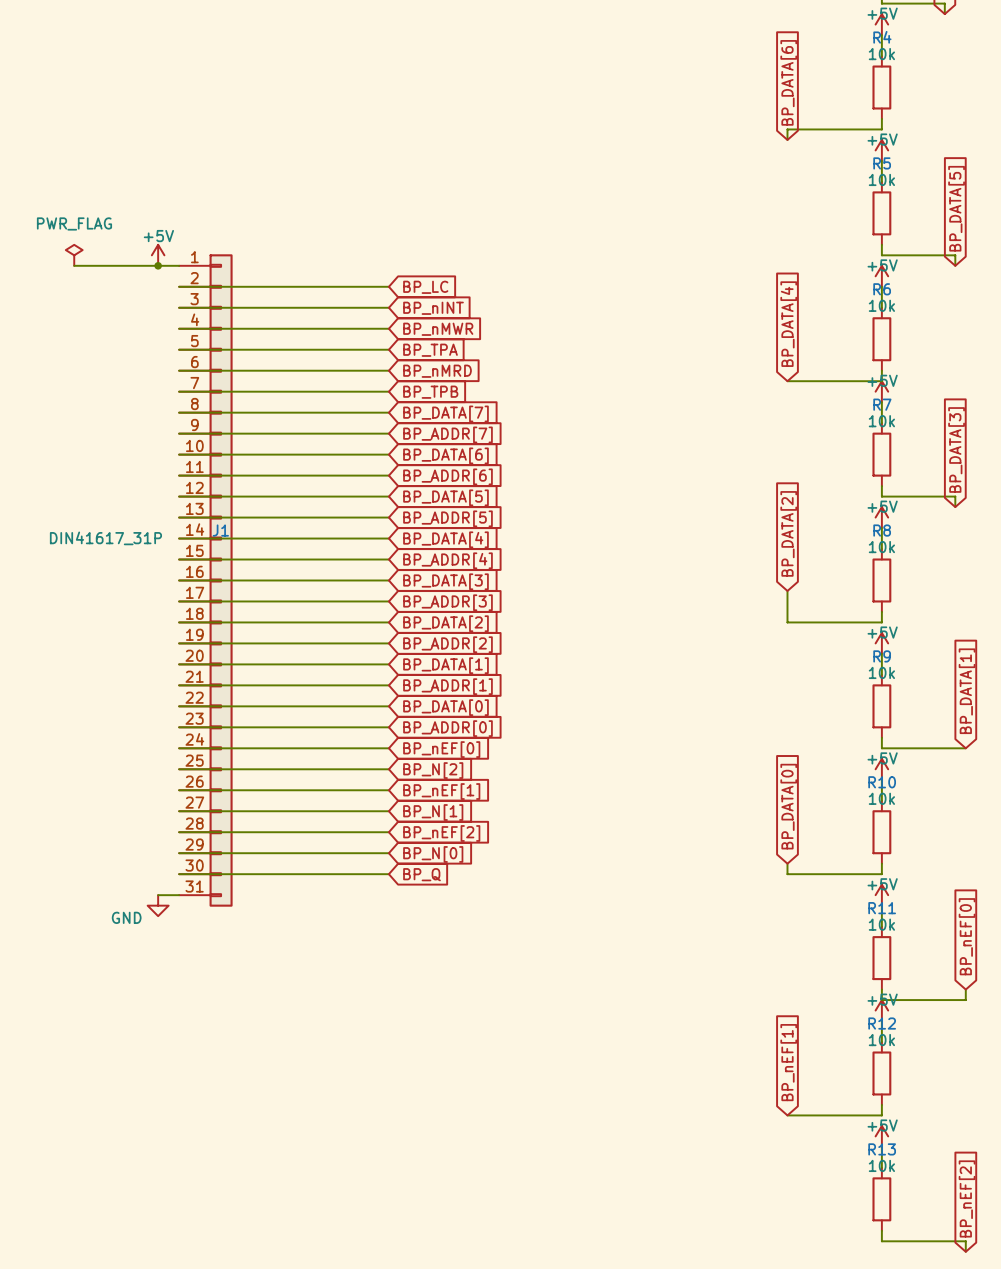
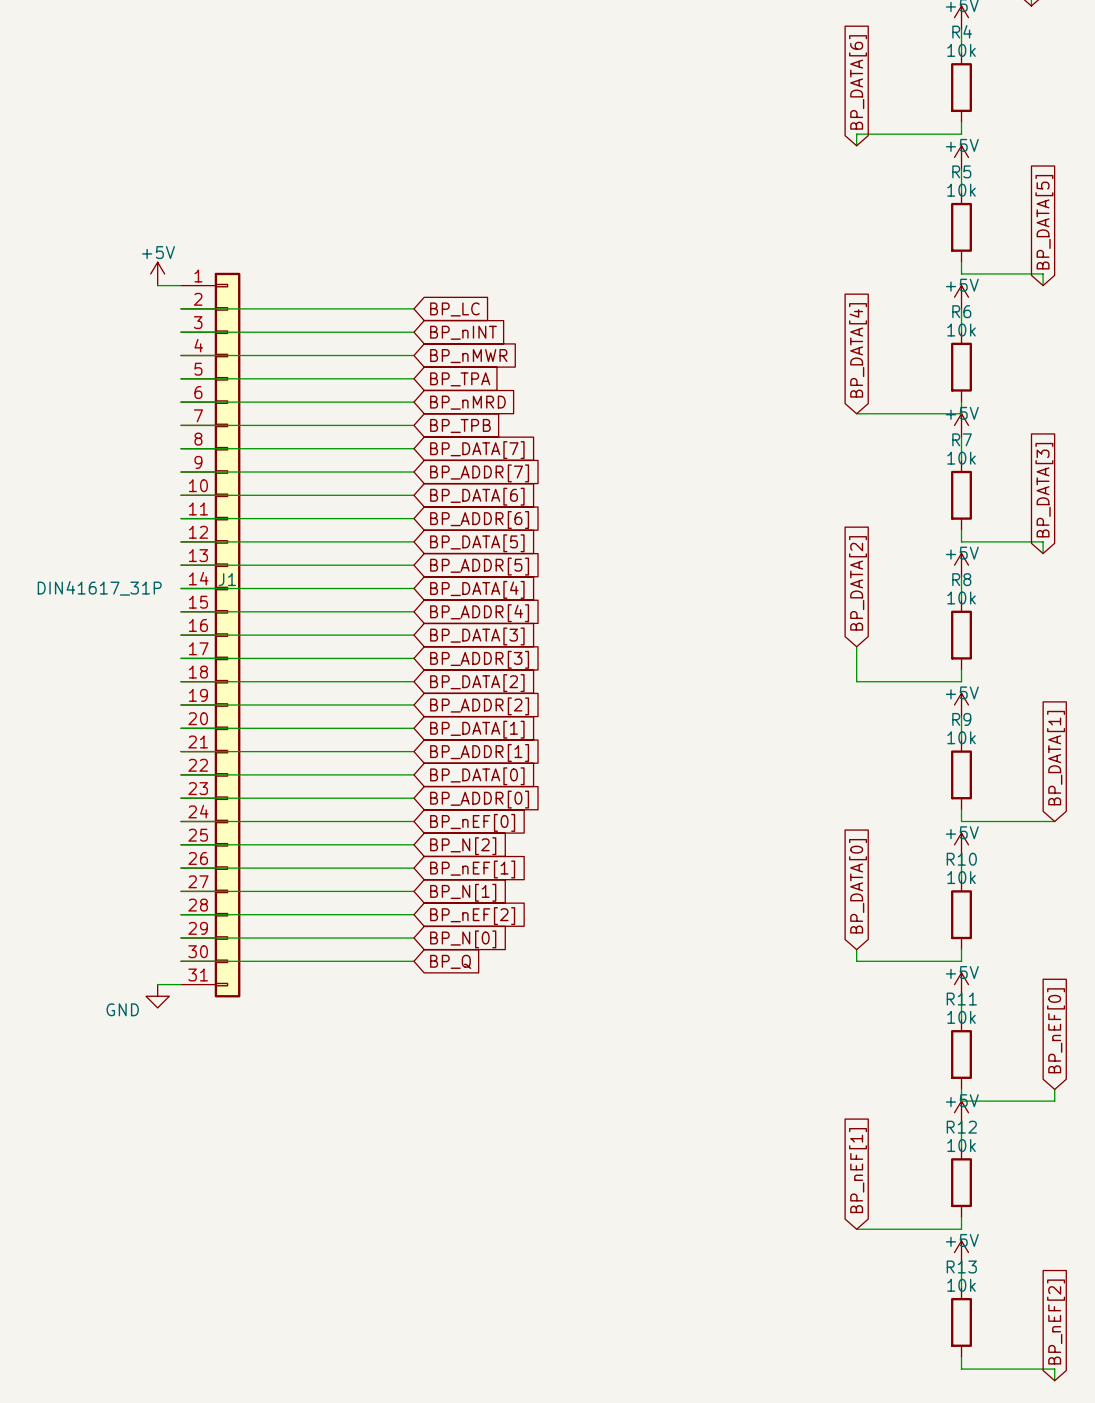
power symbol: PWR_FLAG (74, 255) -> none
wire: (74, 265) (158, 265) -> none
junction: (158, 265) -> none

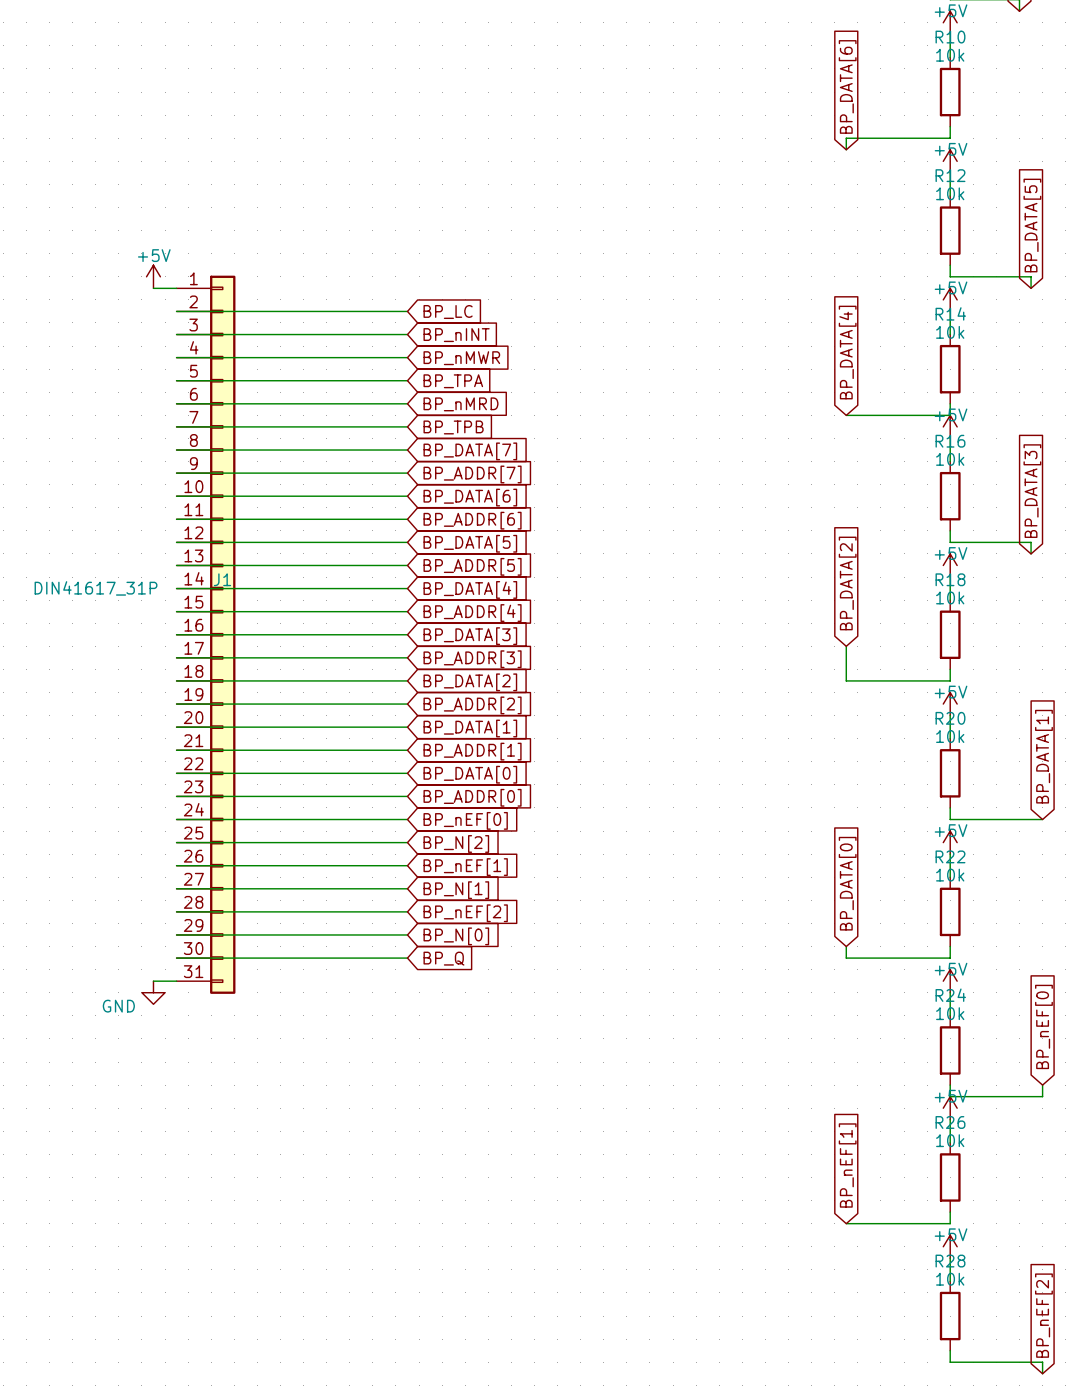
R4 name: R4 (962, 31) -> R10 (950, 37)
R5 name: R5 (961, 171) -> R12 (950, 175)
R6 name: R6 (961, 311) -> R14 (950, 313)
R7 name: R7 (962, 439) -> R16 (950, 441)
R8 name: R8 (961, 579) -> R18 (950, 579)
R9 name: R9 (961, 719) -> R20 (950, 718)
R10 name: R10 (961, 859) -> R22 (950, 856)
R11 name: R11 (961, 999) -> R24 (950, 995)
R12 name: R12 (961, 1127) -> R26 (950, 1122)
R13 name: R13 (961, 1266) -> R28 (950, 1261)

